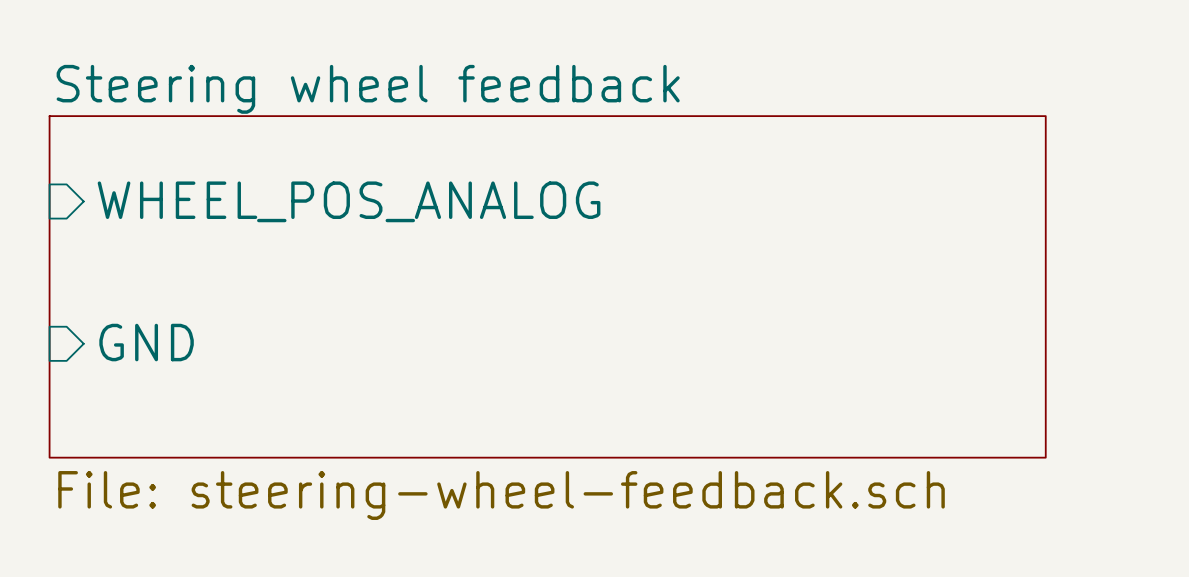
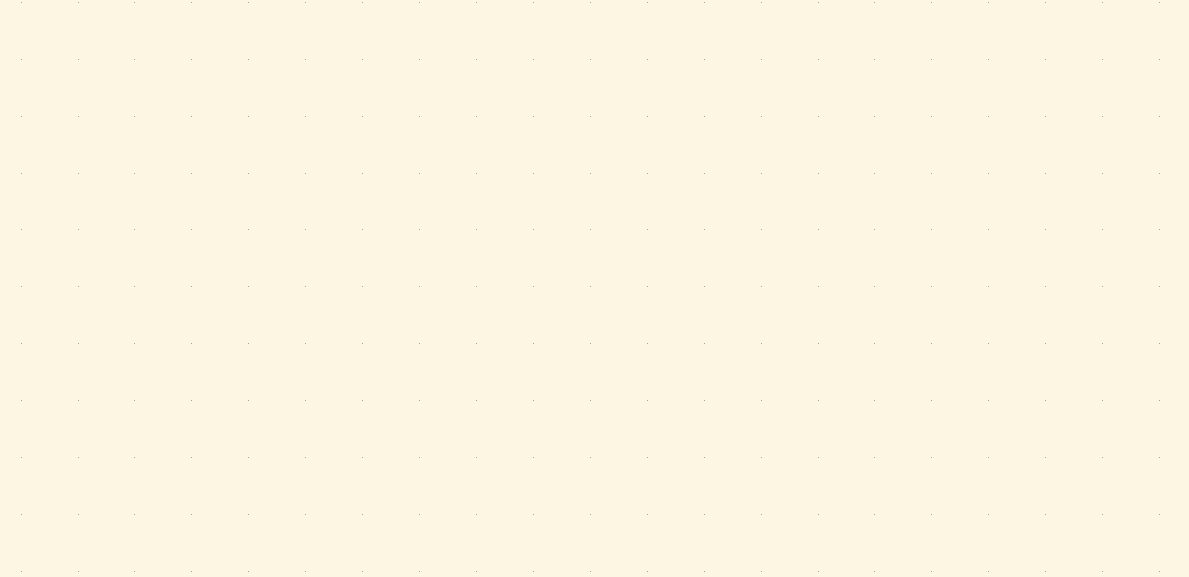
sheet pin: WHEEL_POS_ANALOG (349, 201) -> none
sheet Steering wheel feedback: File: steering-wheel-feedback.sch (547, 286) -> none
sheet pin: GND (146, 342) -> none

